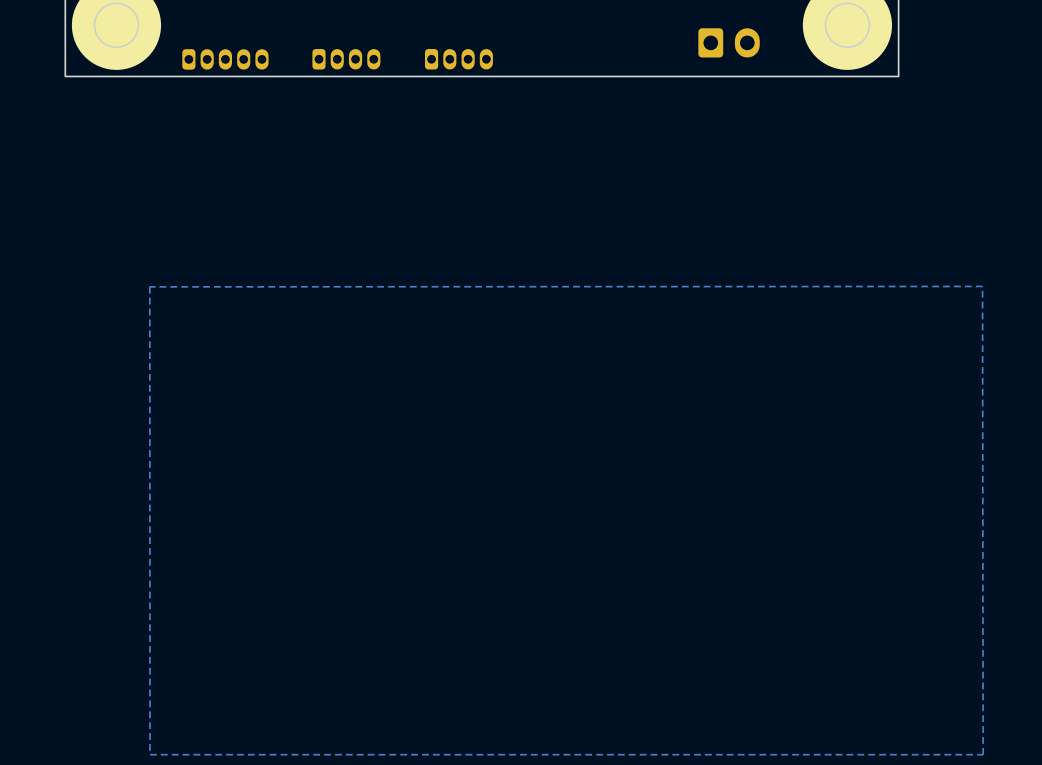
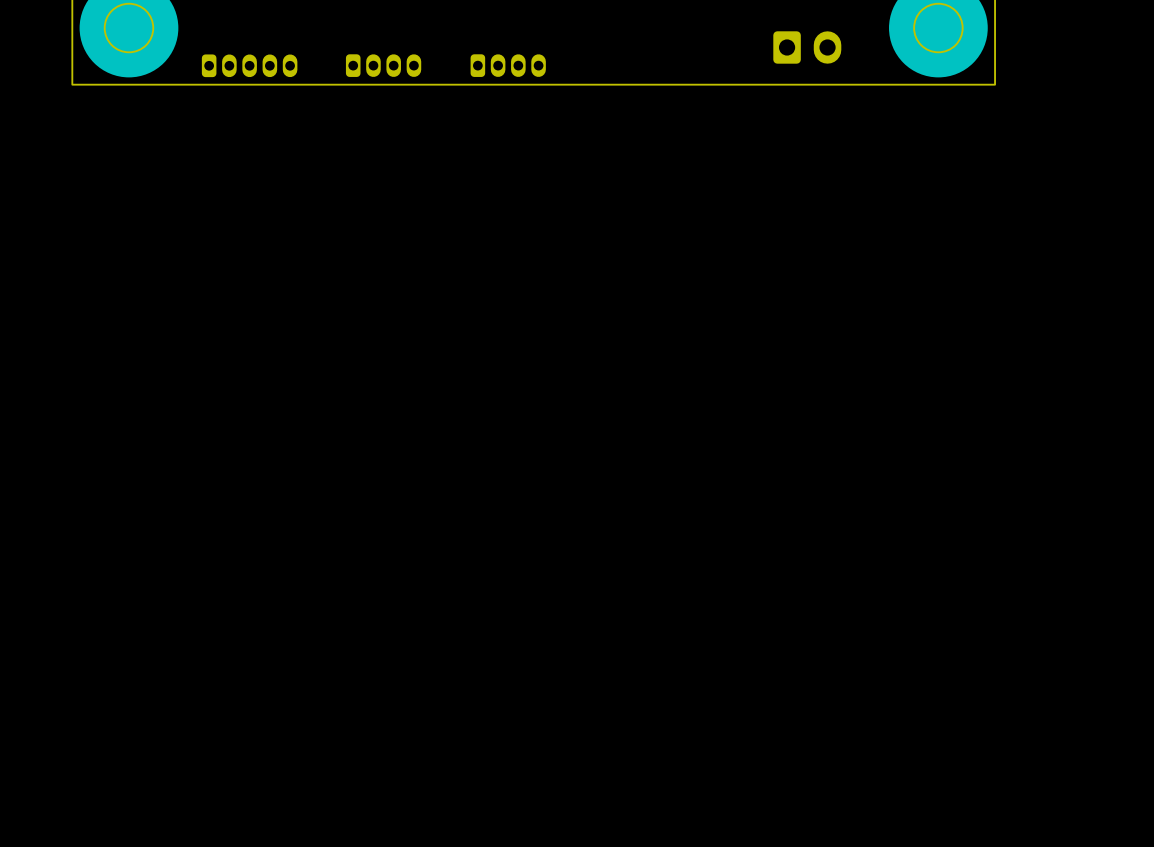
zone outline: (982, 286) (149, 286) (149, 754) (983, 754) (982, 286) -> none

